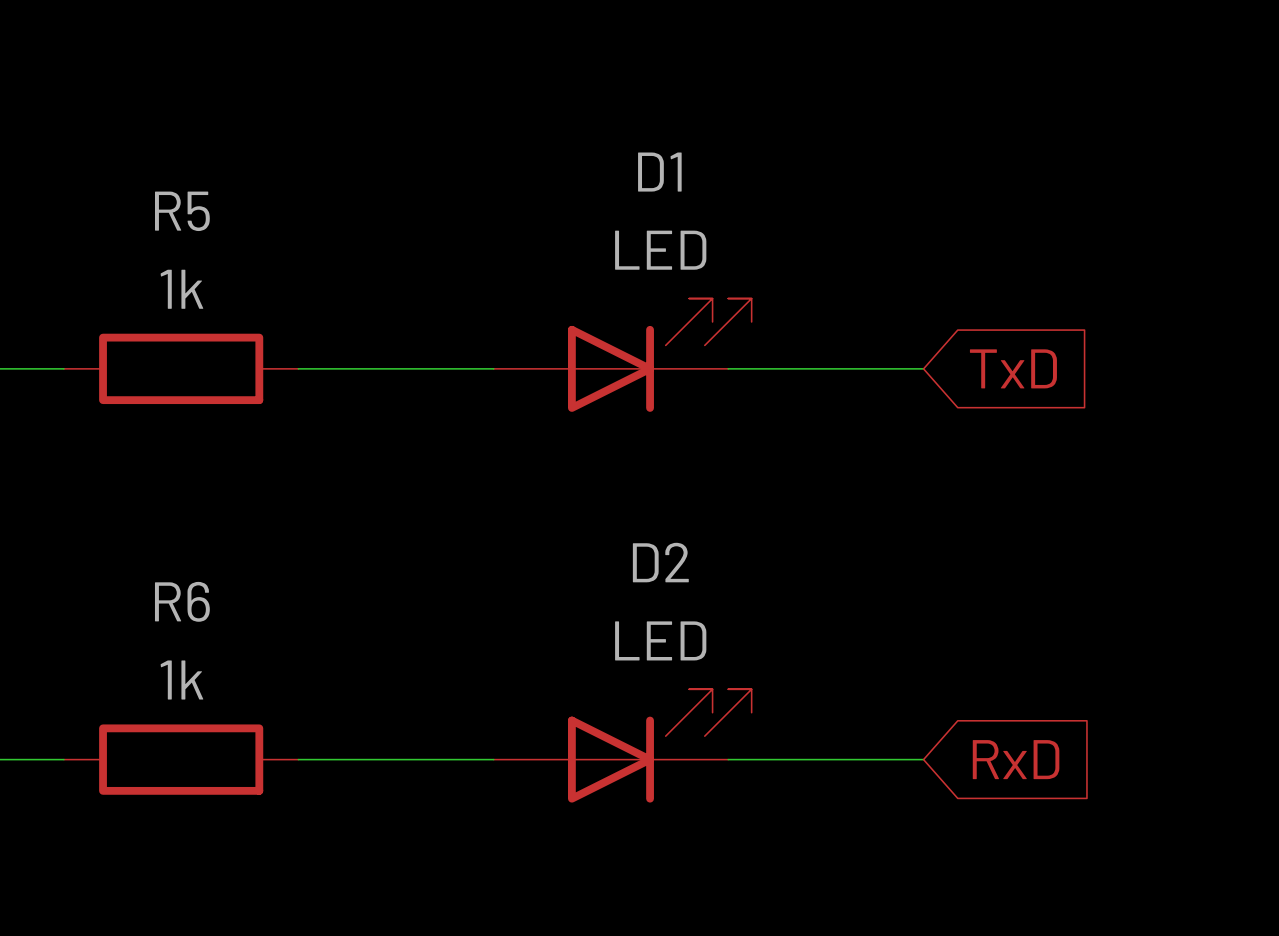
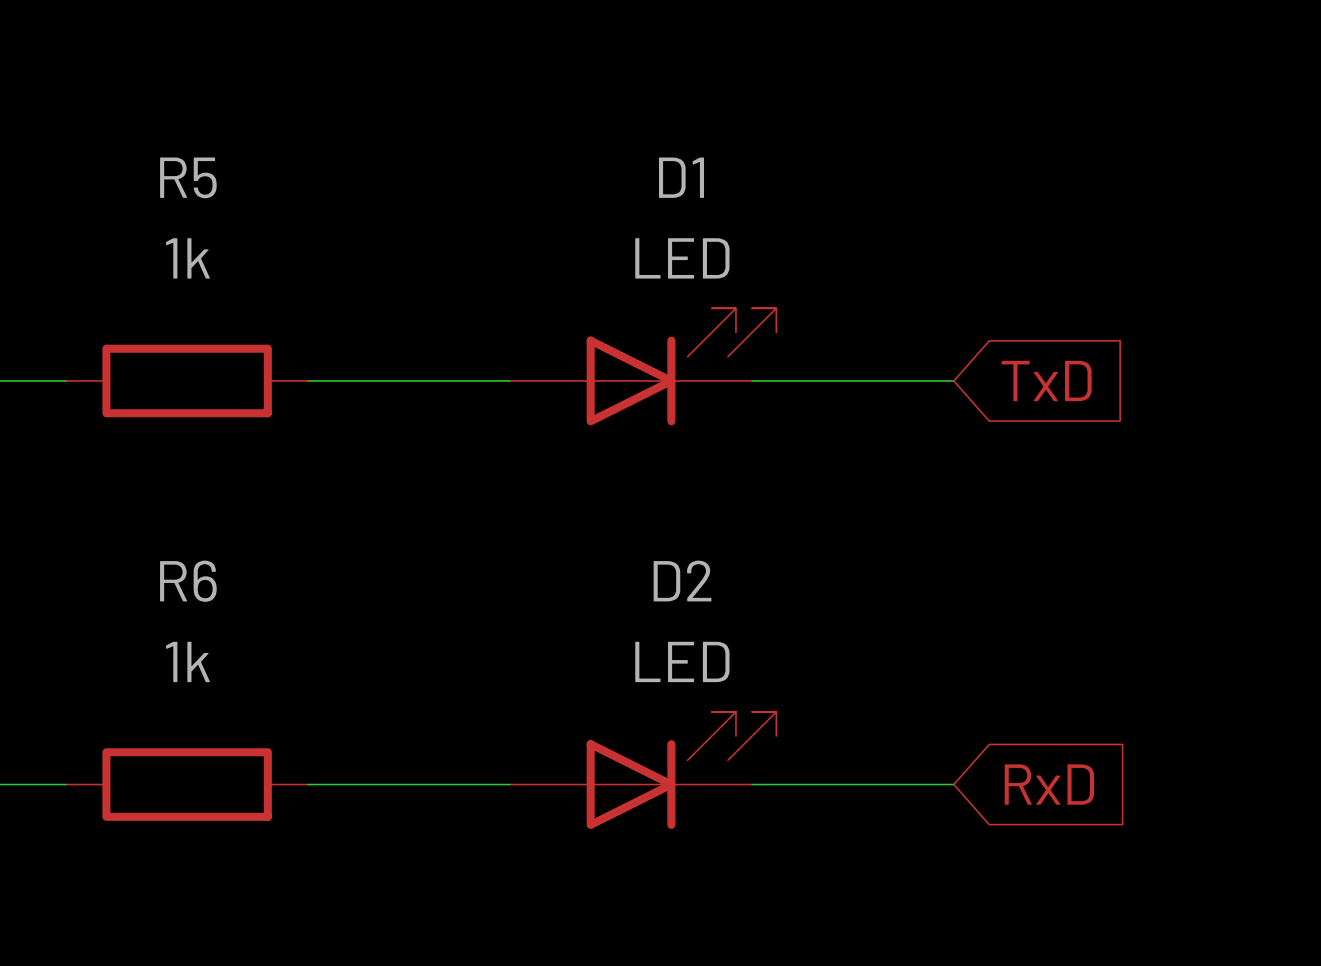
R5 name position: R5 (182, 211) -> R5 (188, 177)
R5 value position: 1k (181, 289) -> 1k (187, 258)
R6 name position: R6 (182, 601) -> R6 (188, 581)
R6 value position: 1k (181, 680) -> 1k (187, 661)

